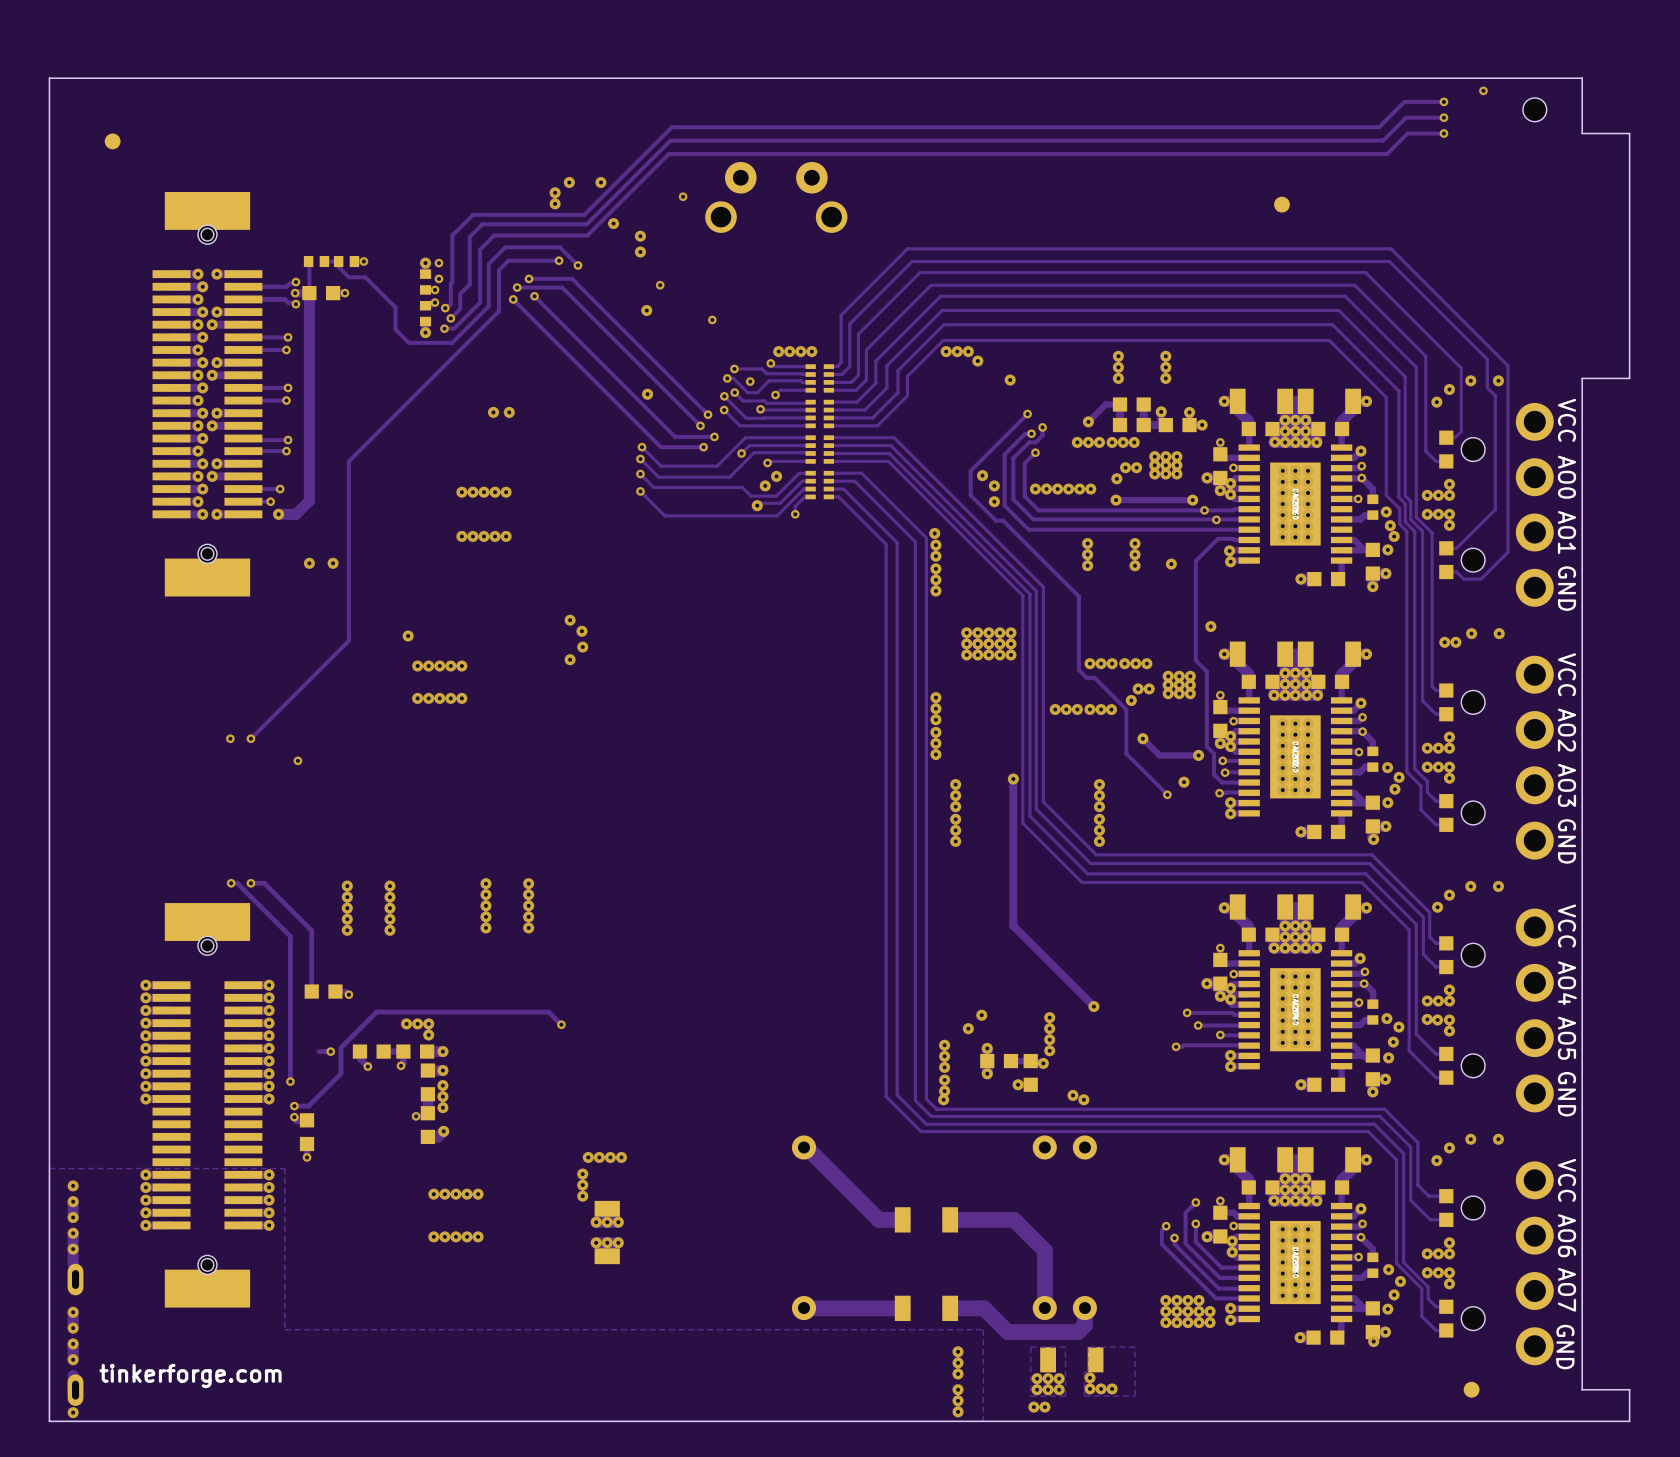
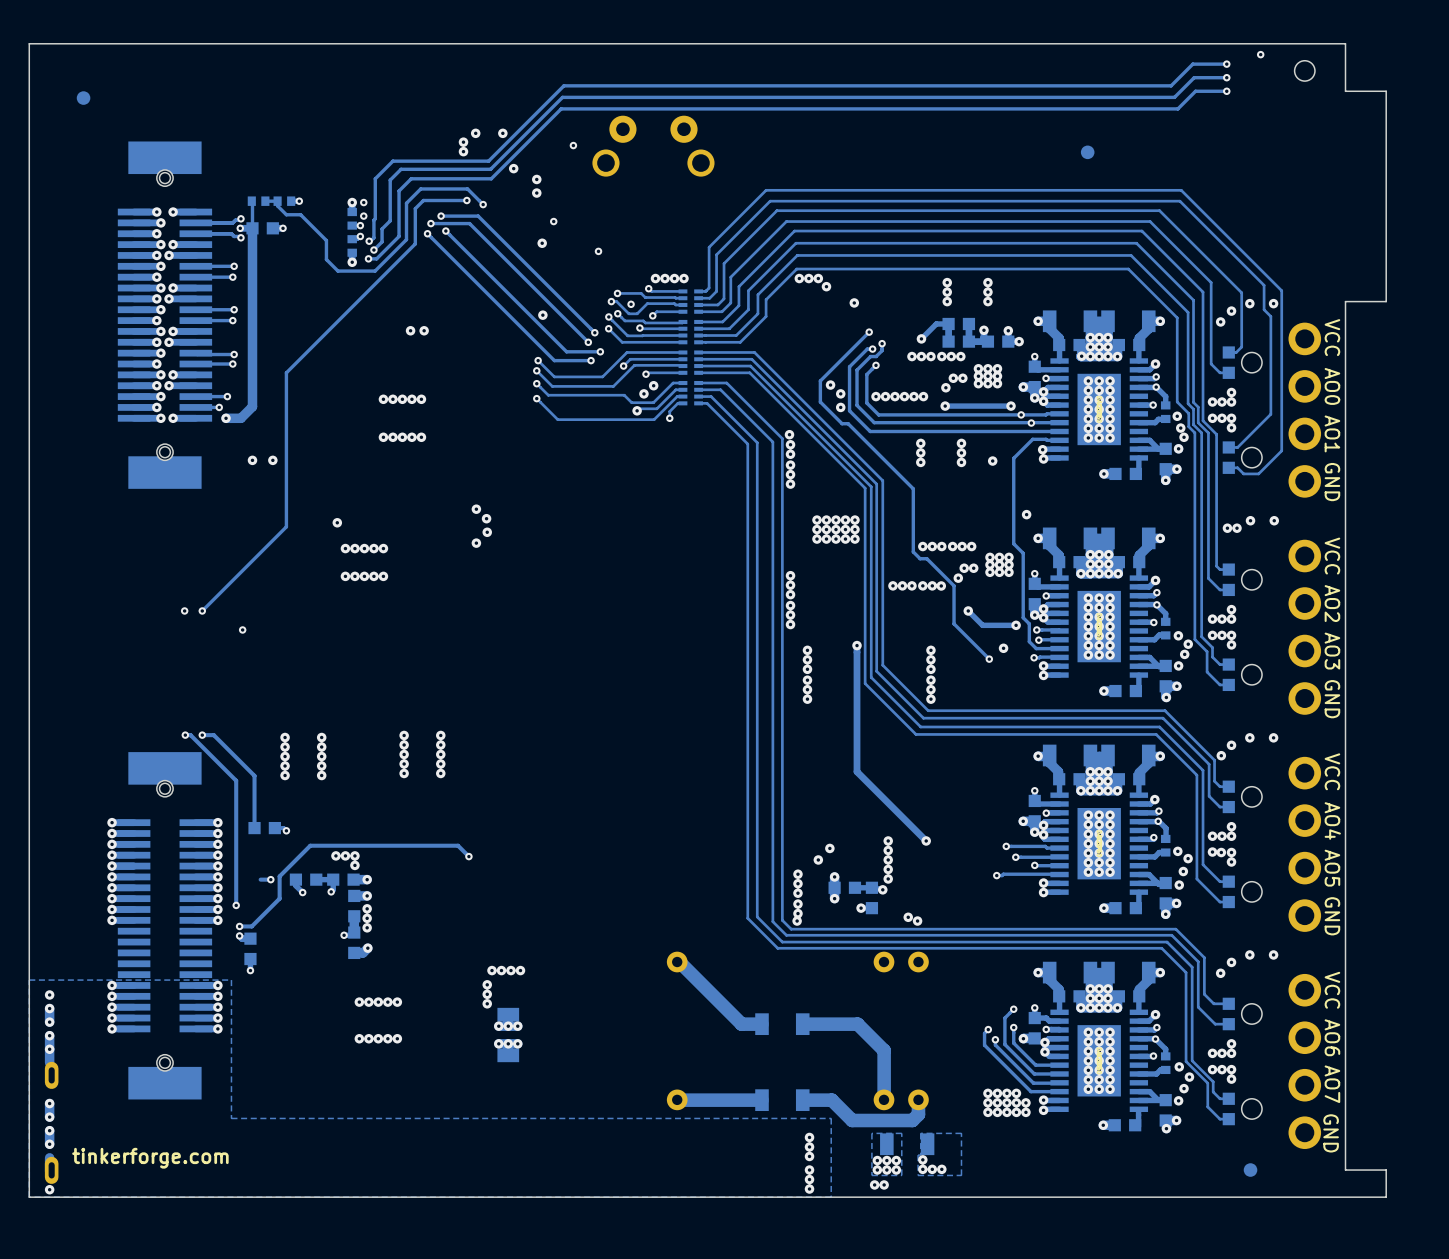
via: none -> (888, 840)

